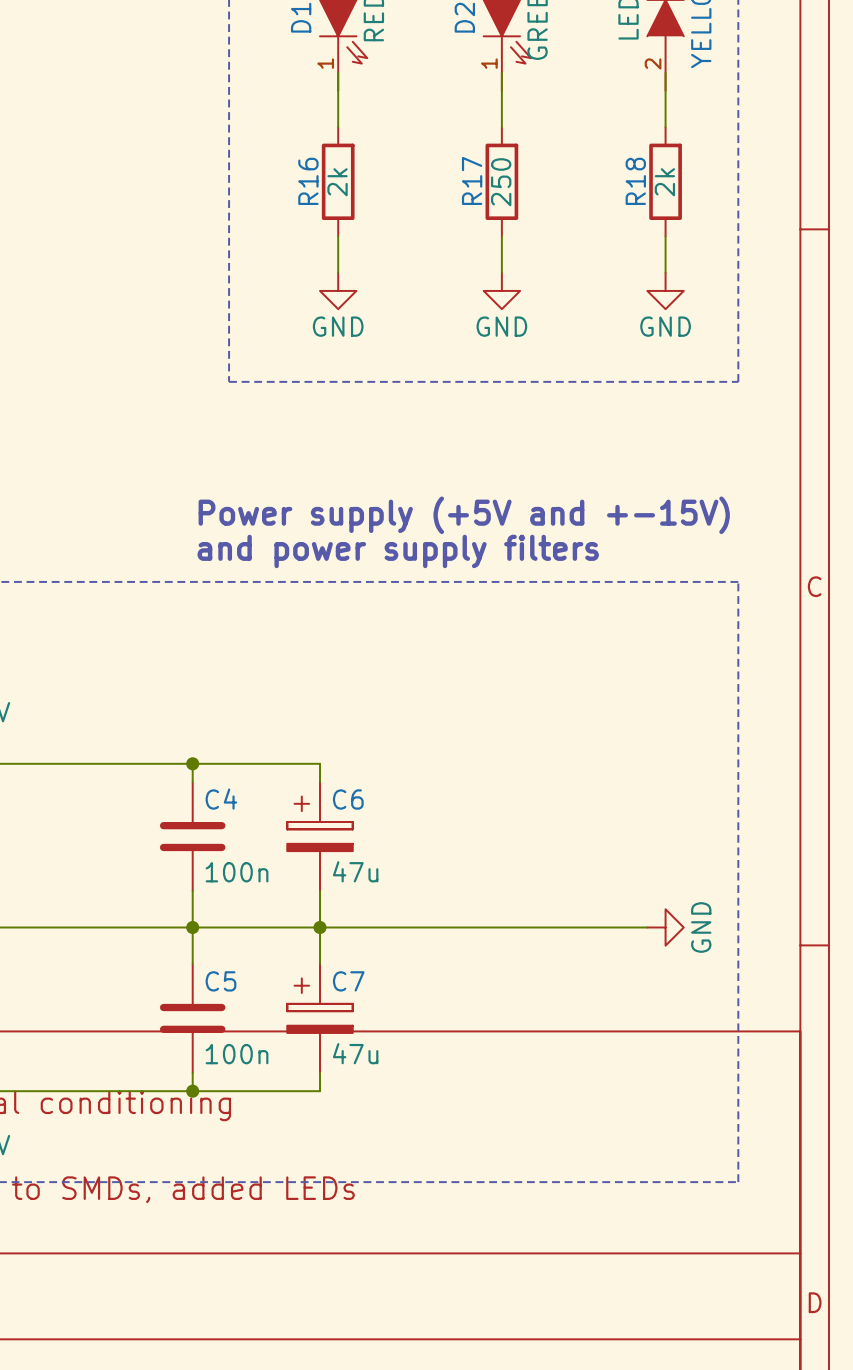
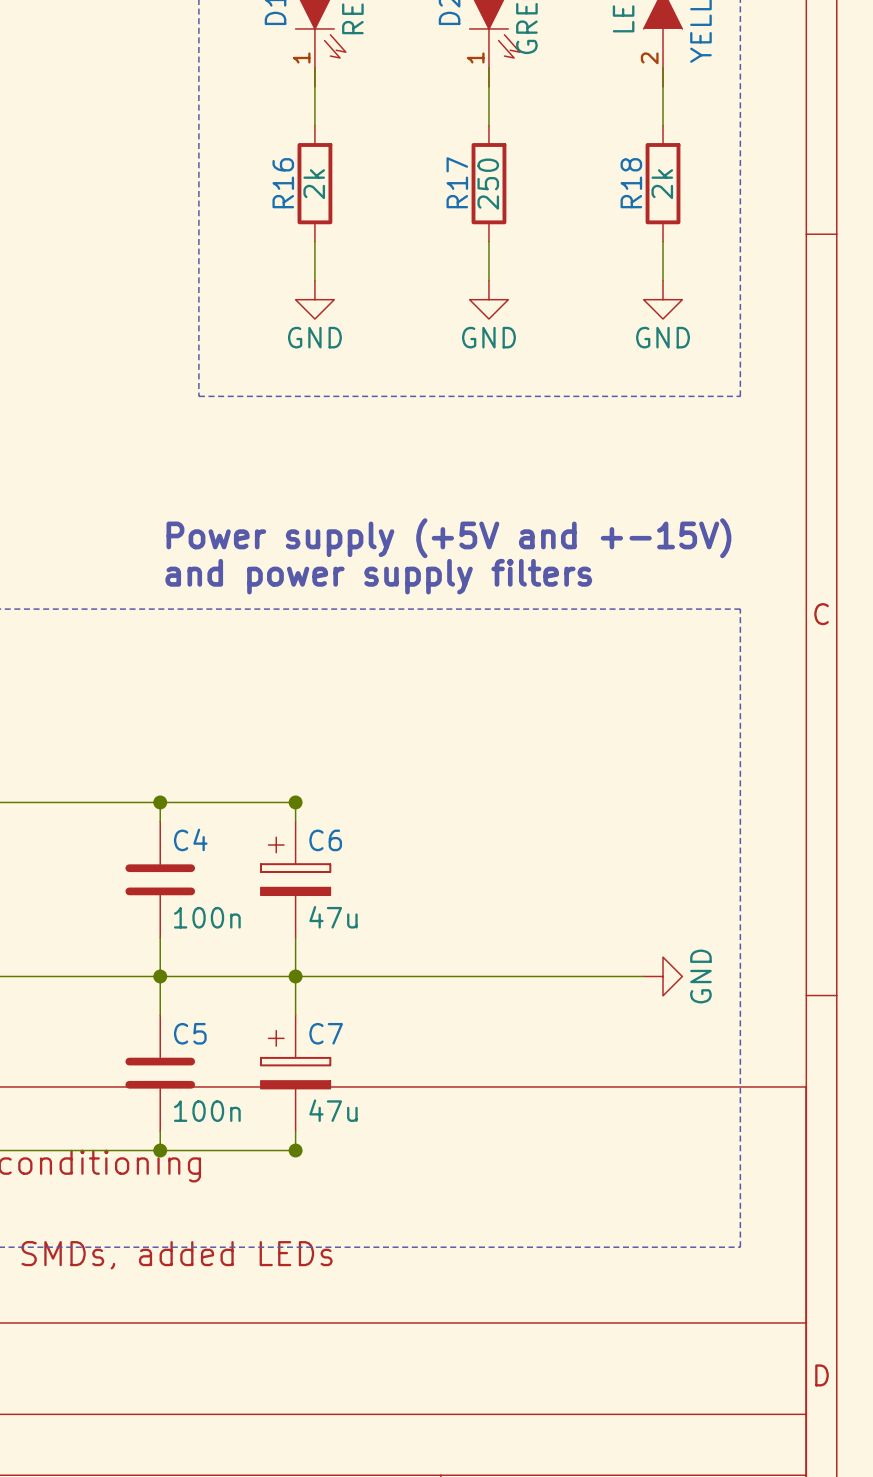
junction: none -> (295, 802)
junction: none -> (295, 1150)

